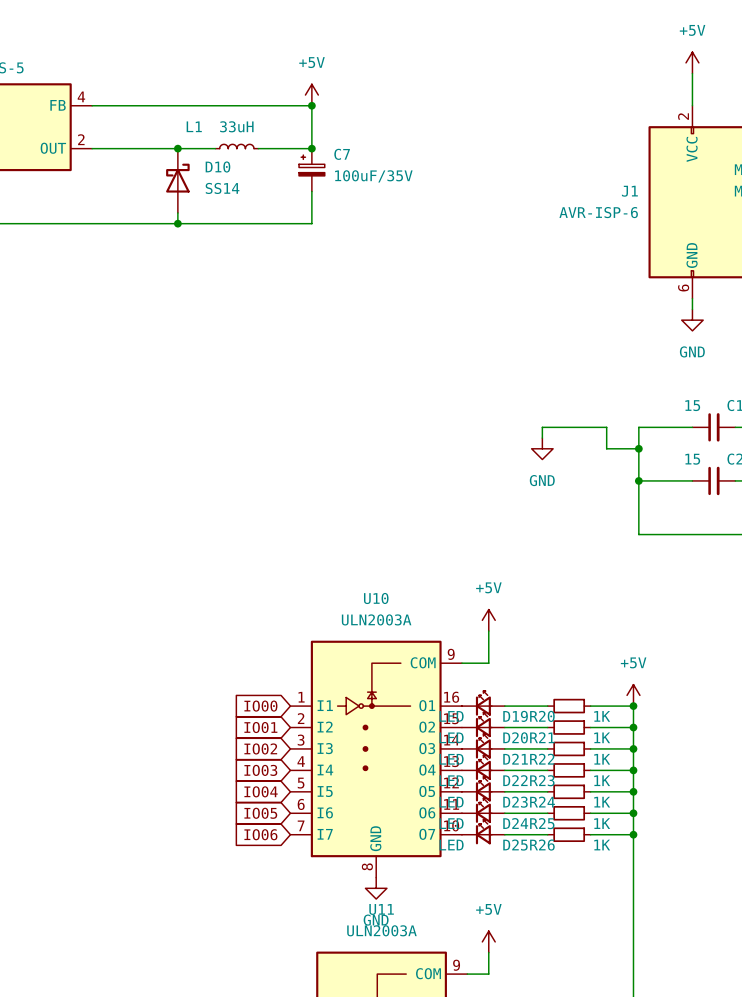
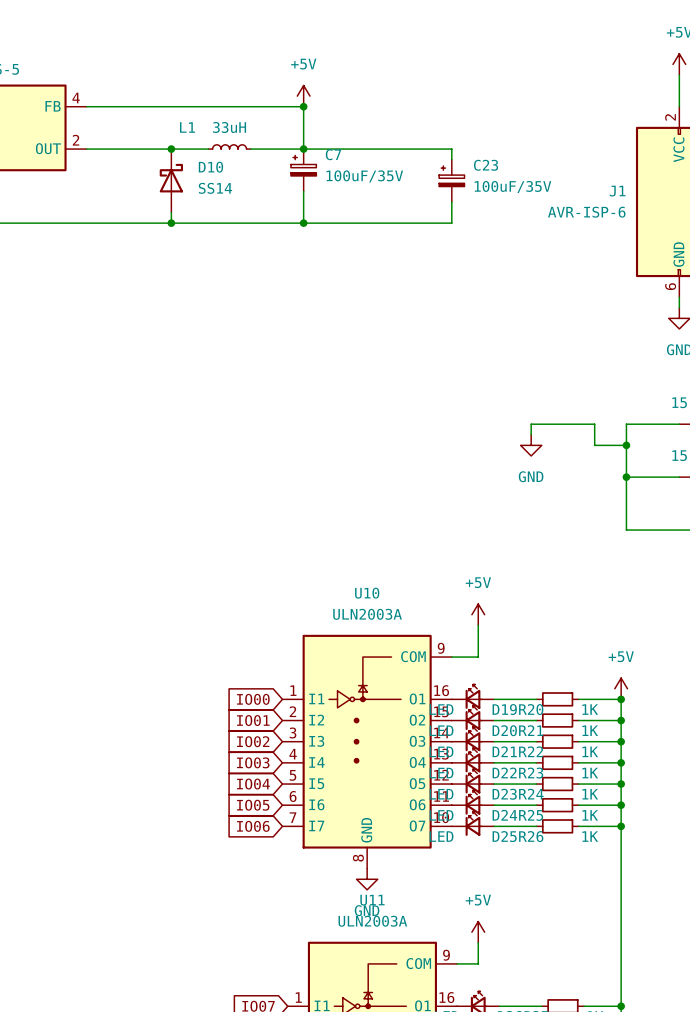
wire: none -> (303, 149) (451, 149) (451, 159)
C23: none -> 100uF/35V (451, 180)
wire: none -> (451, 201) (451, 223) (303, 223)
junction: none -> (303, 223)

